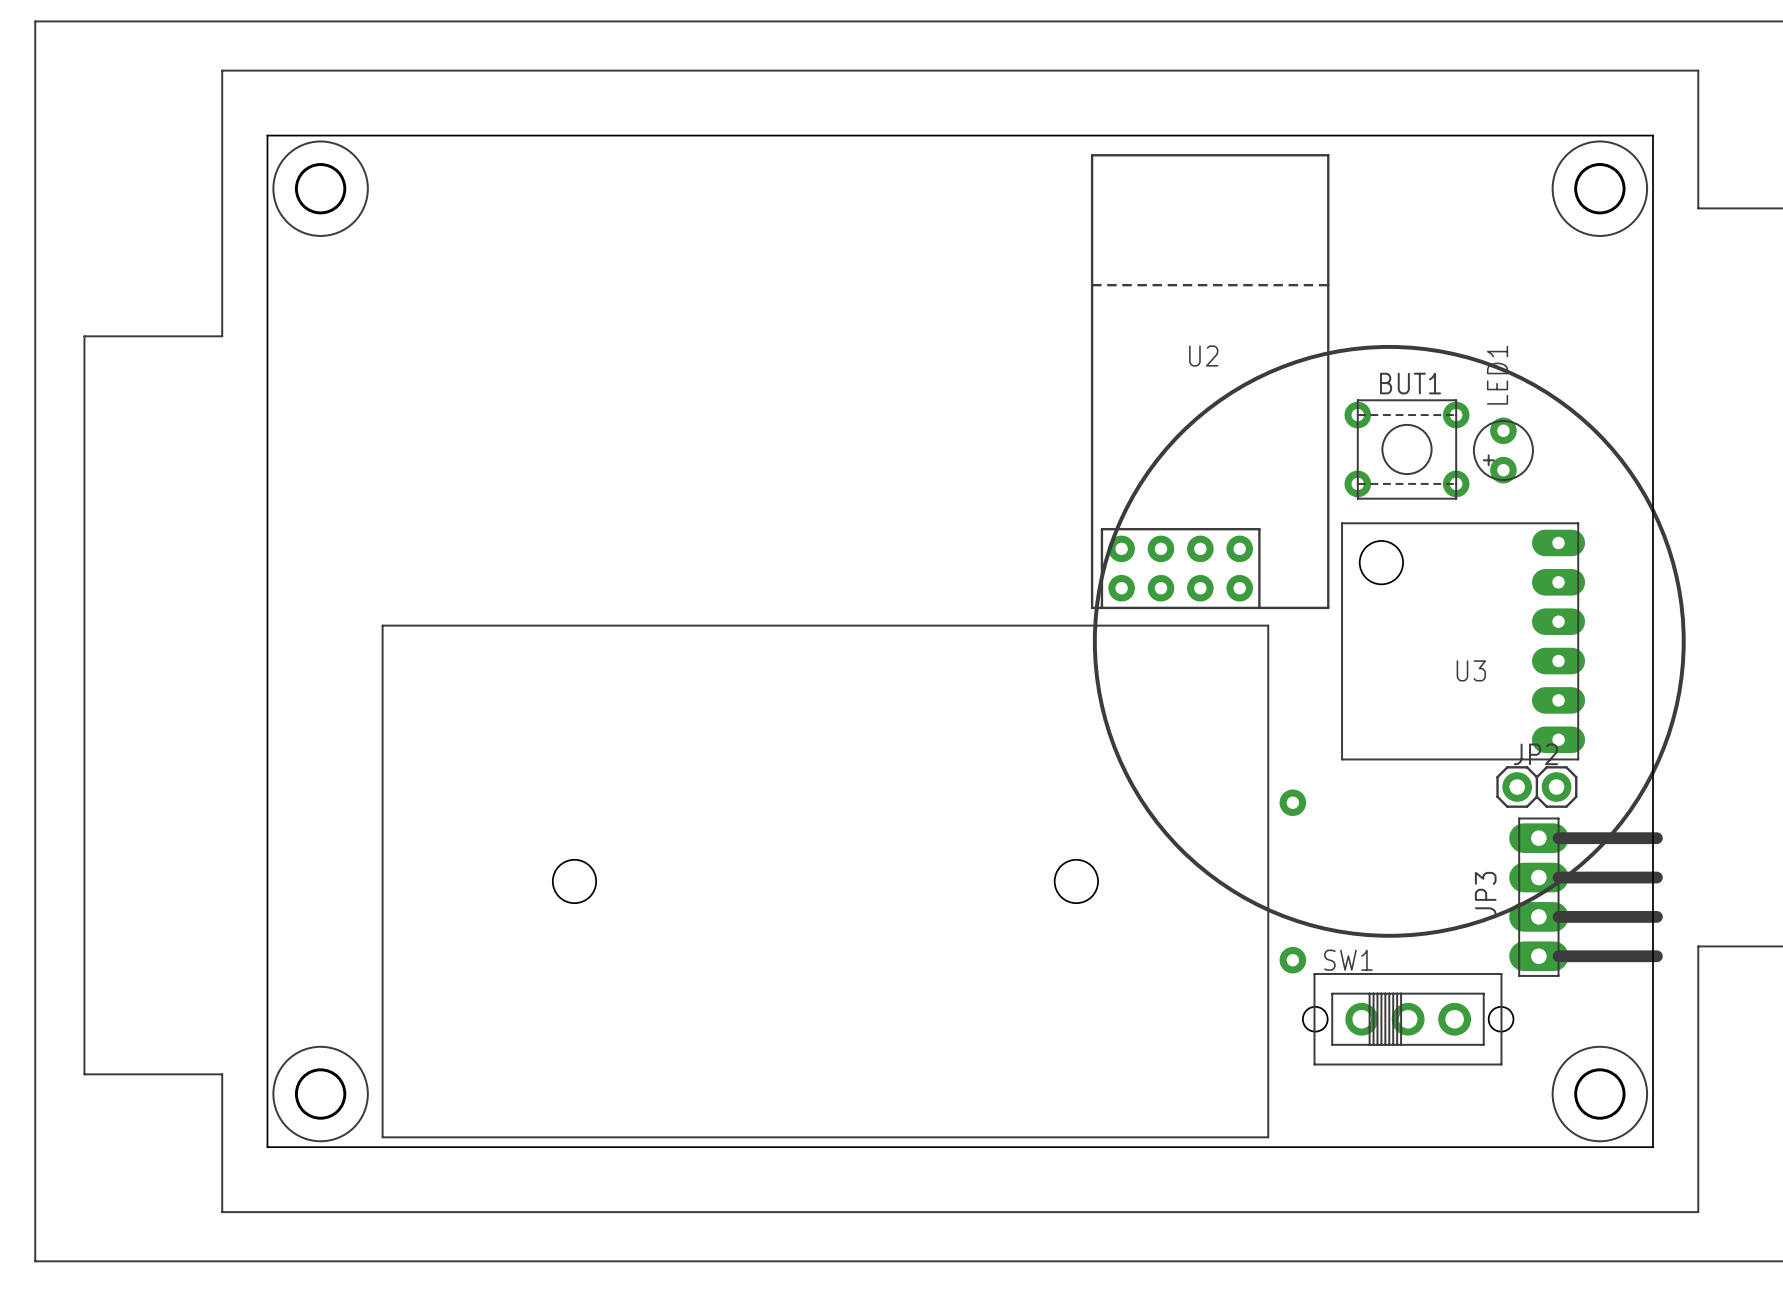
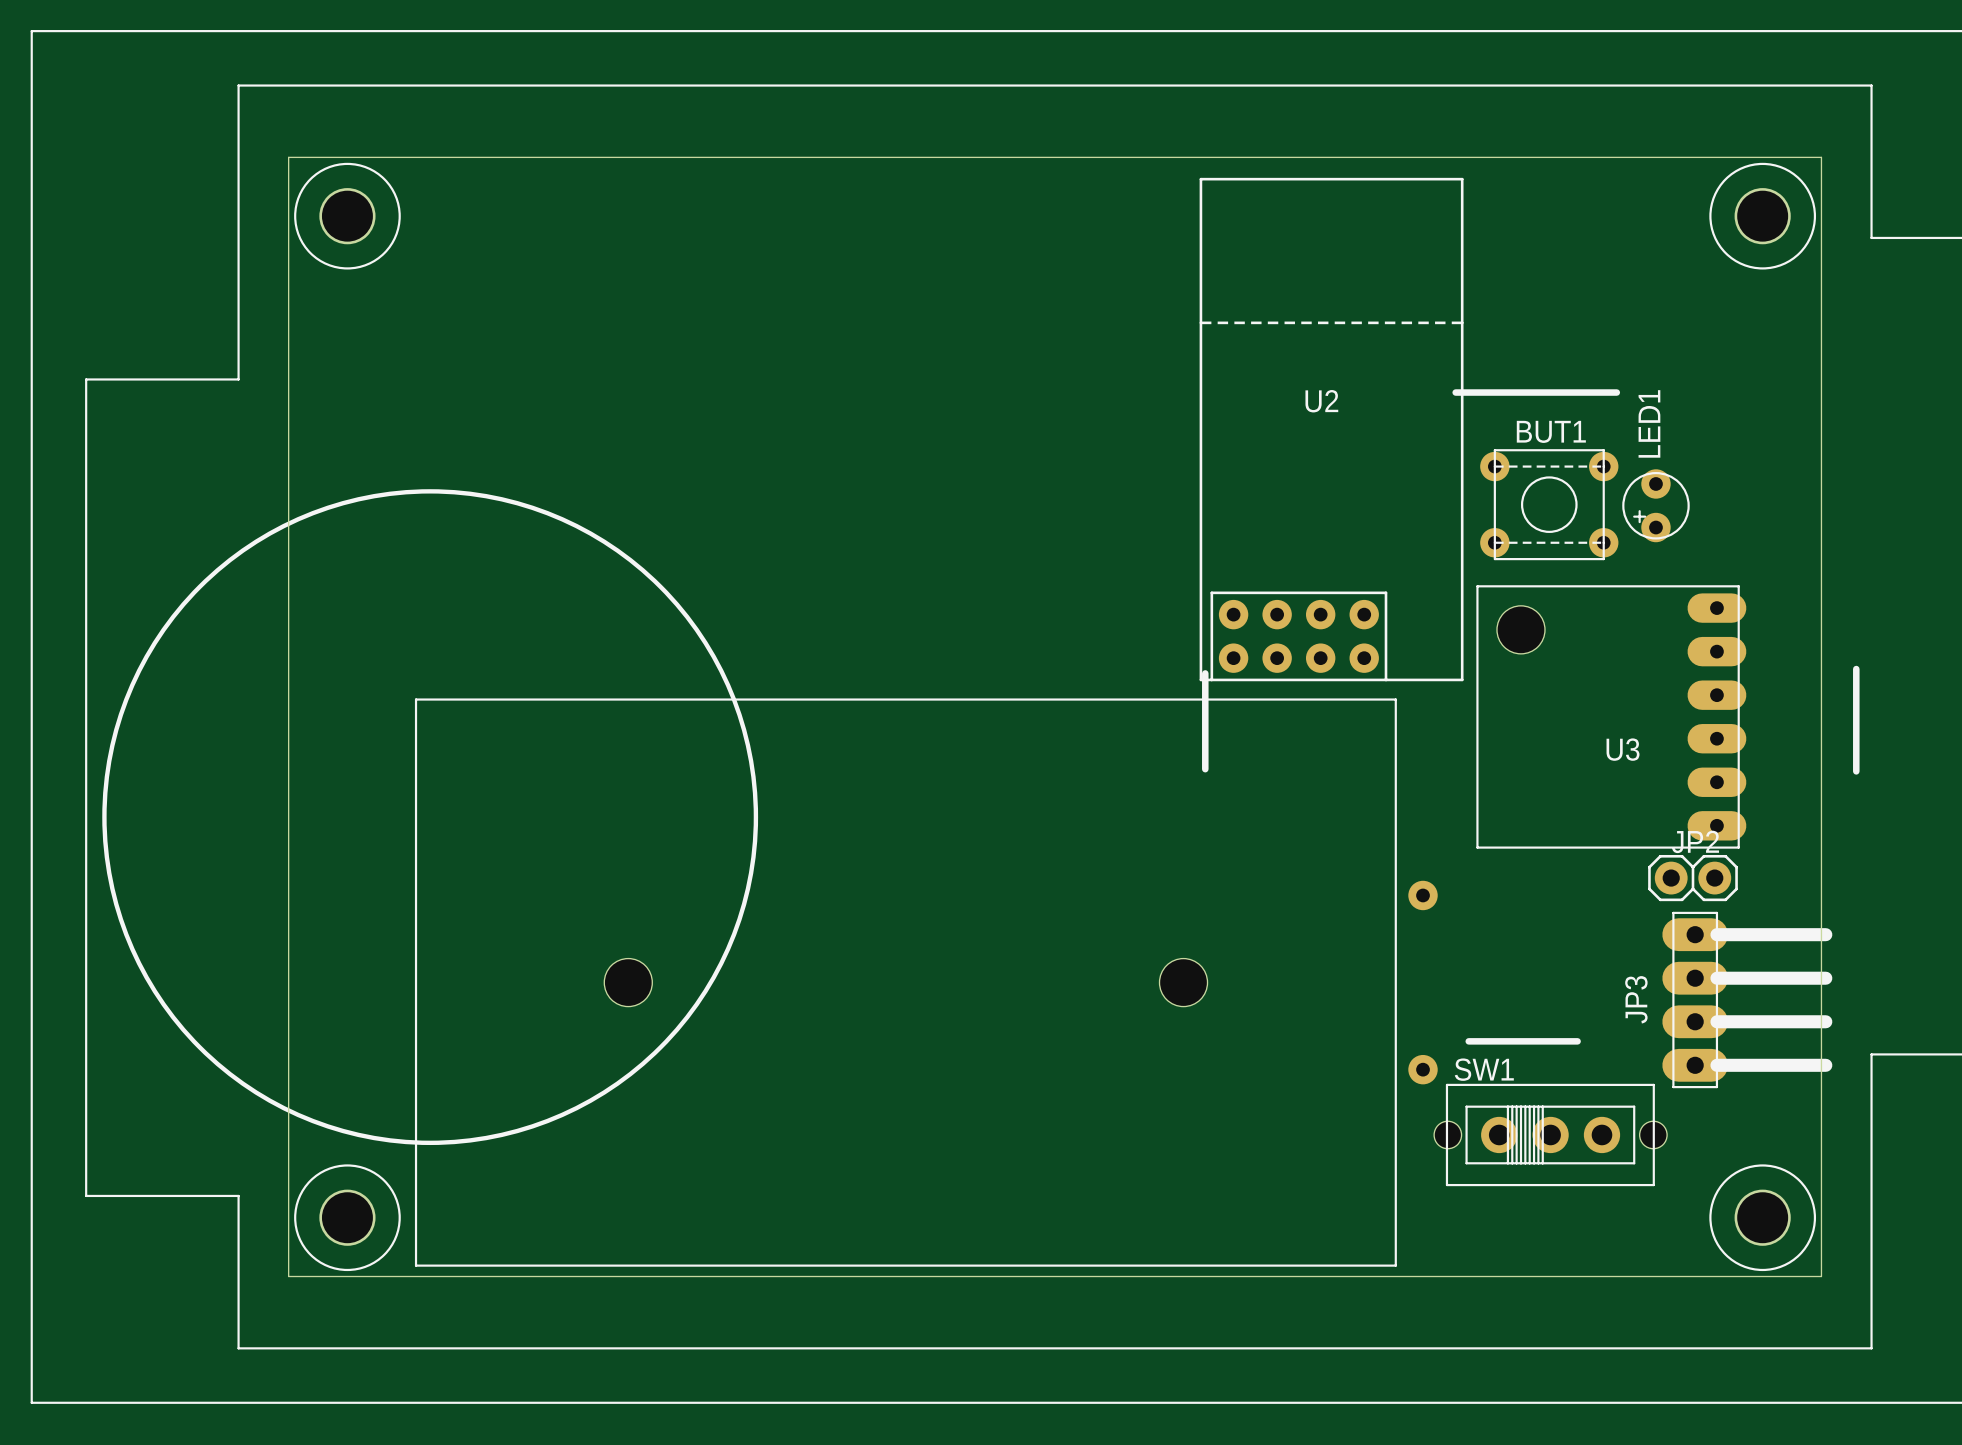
drawing: [1092, 344, 1686, 938] -> none
line: none -> (1455, 392) (1616, 392)
drawing: none -> [102, 489, 759, 1146]
line: none -> (1856, 669) (1856, 771)
line: none -> (1205, 673) (1205, 769)
line: none -> (1468, 1041) (1577, 1041)

